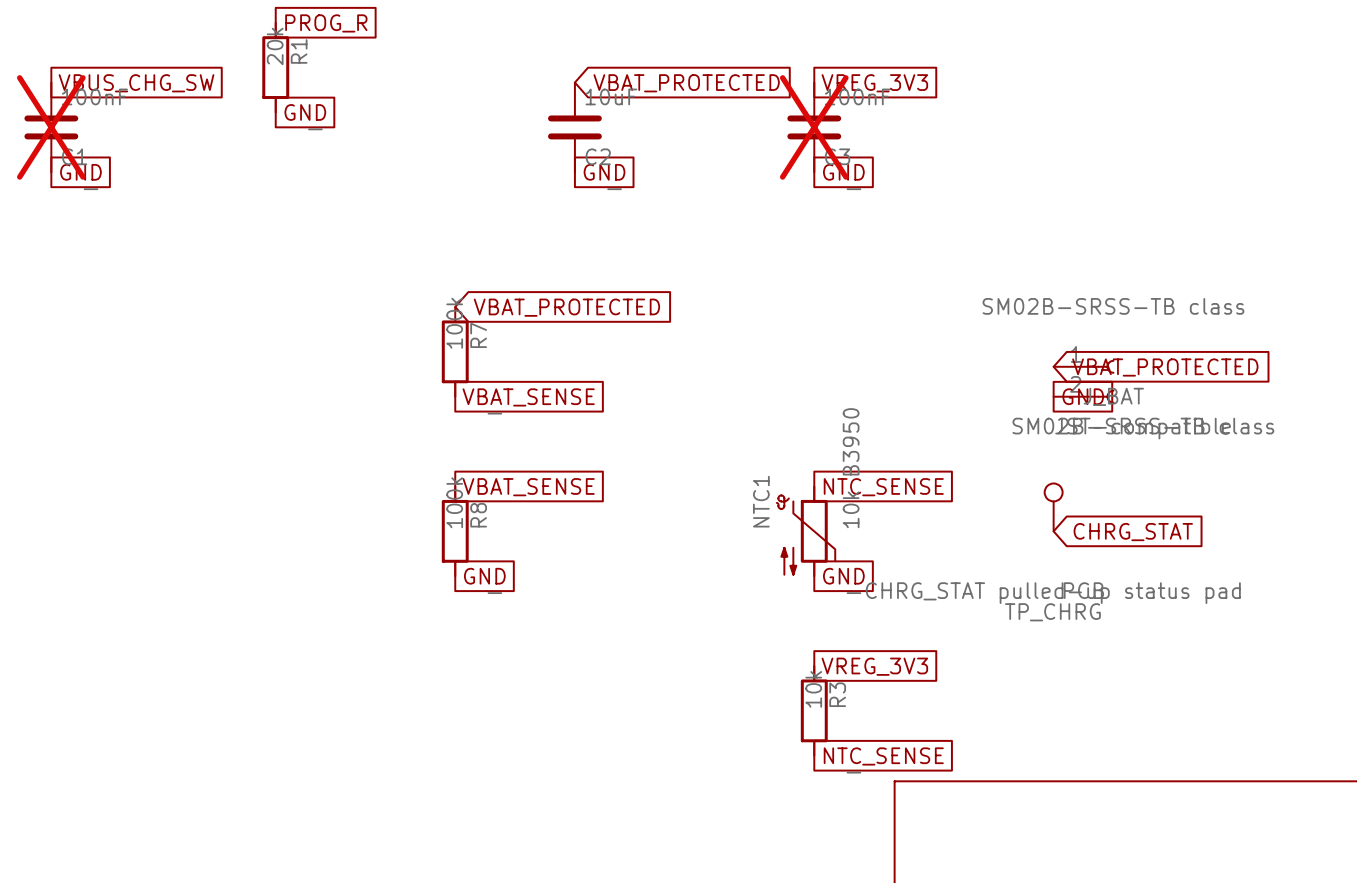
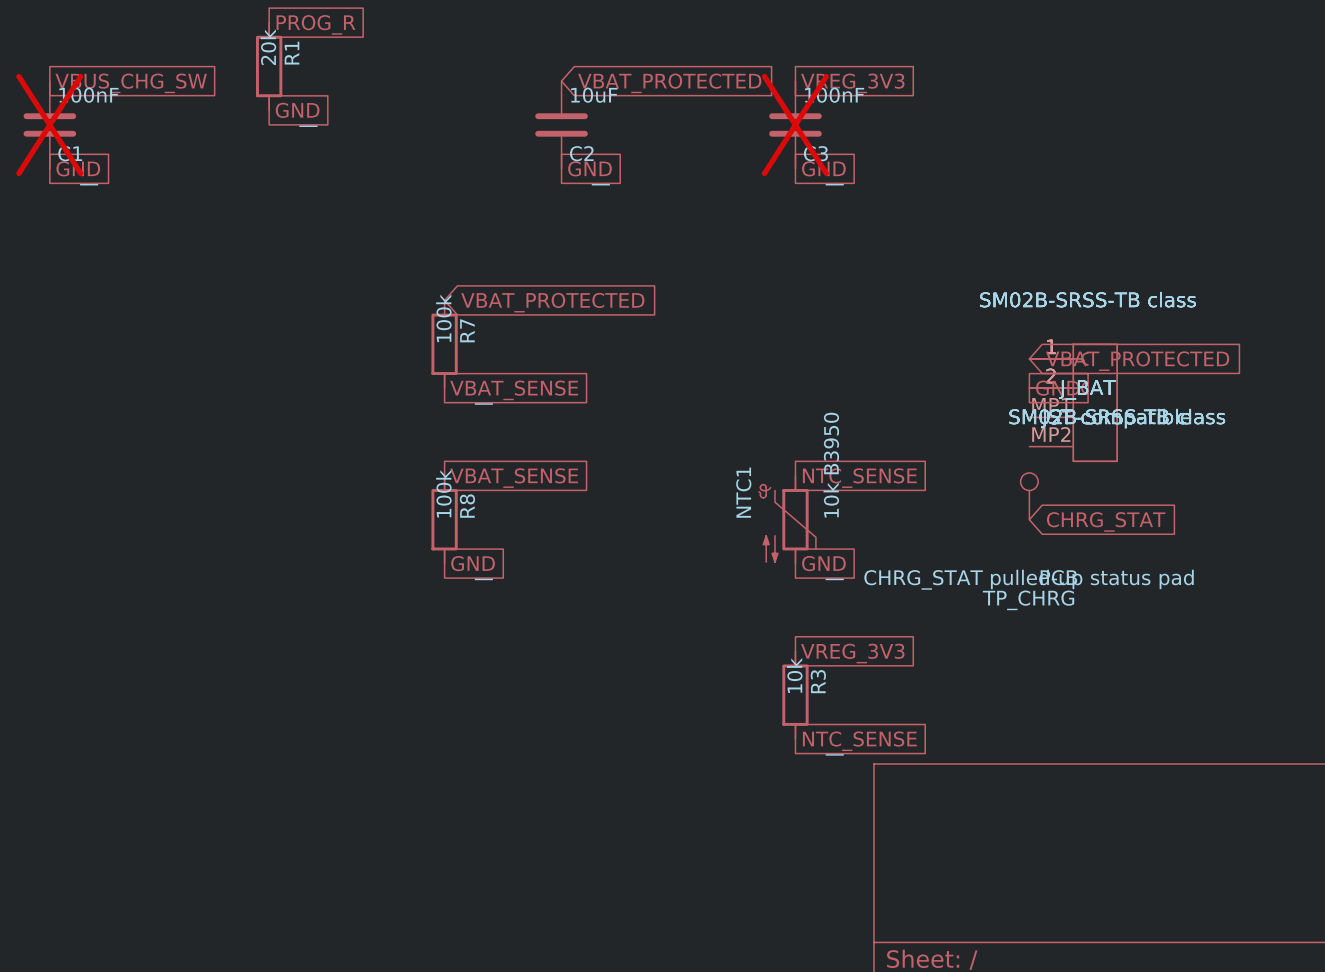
J_BAT: none -> SM02B-SRSS-TB class (1073, 402)

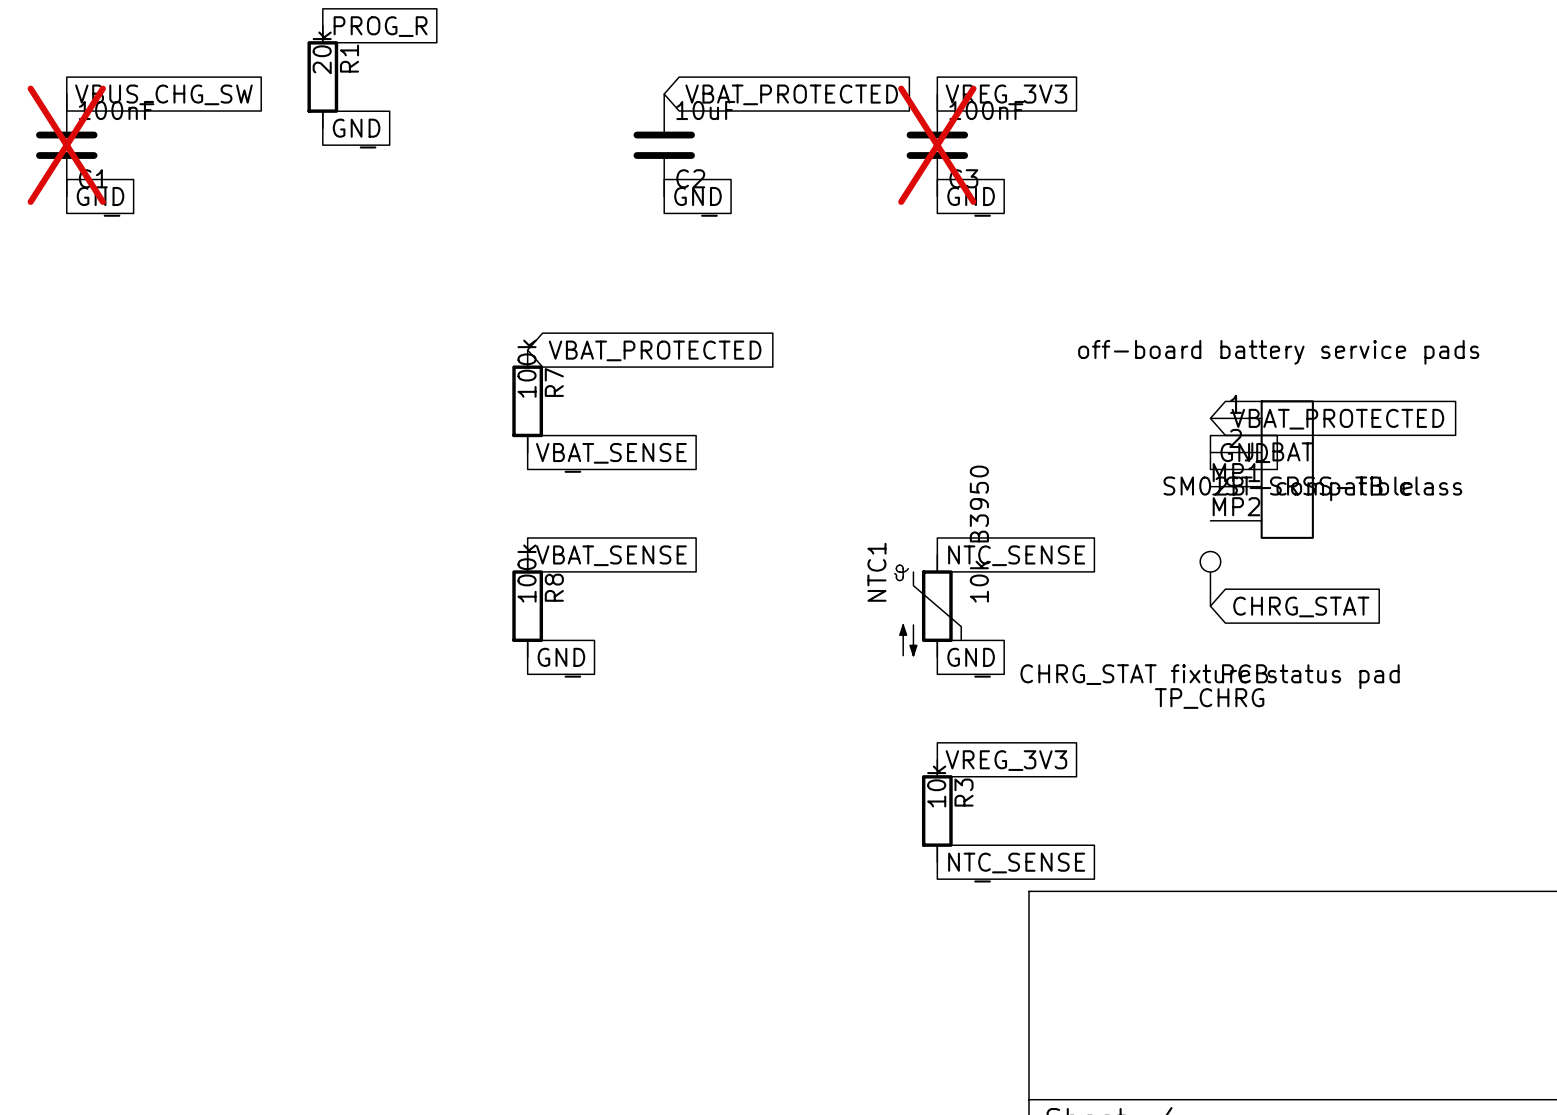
J_BAT value: SM02B-SRSS-TB class (1088, 299) -> off-board battery service pads (1278, 352)
J_BAT: SM02B-SRSS-TB class (1059, 373) -> none
TP_CHRG value: CHRG_STAT pulled-up status pad (1029, 579) -> CHRG_STAT fixture status pad (1210, 676)

